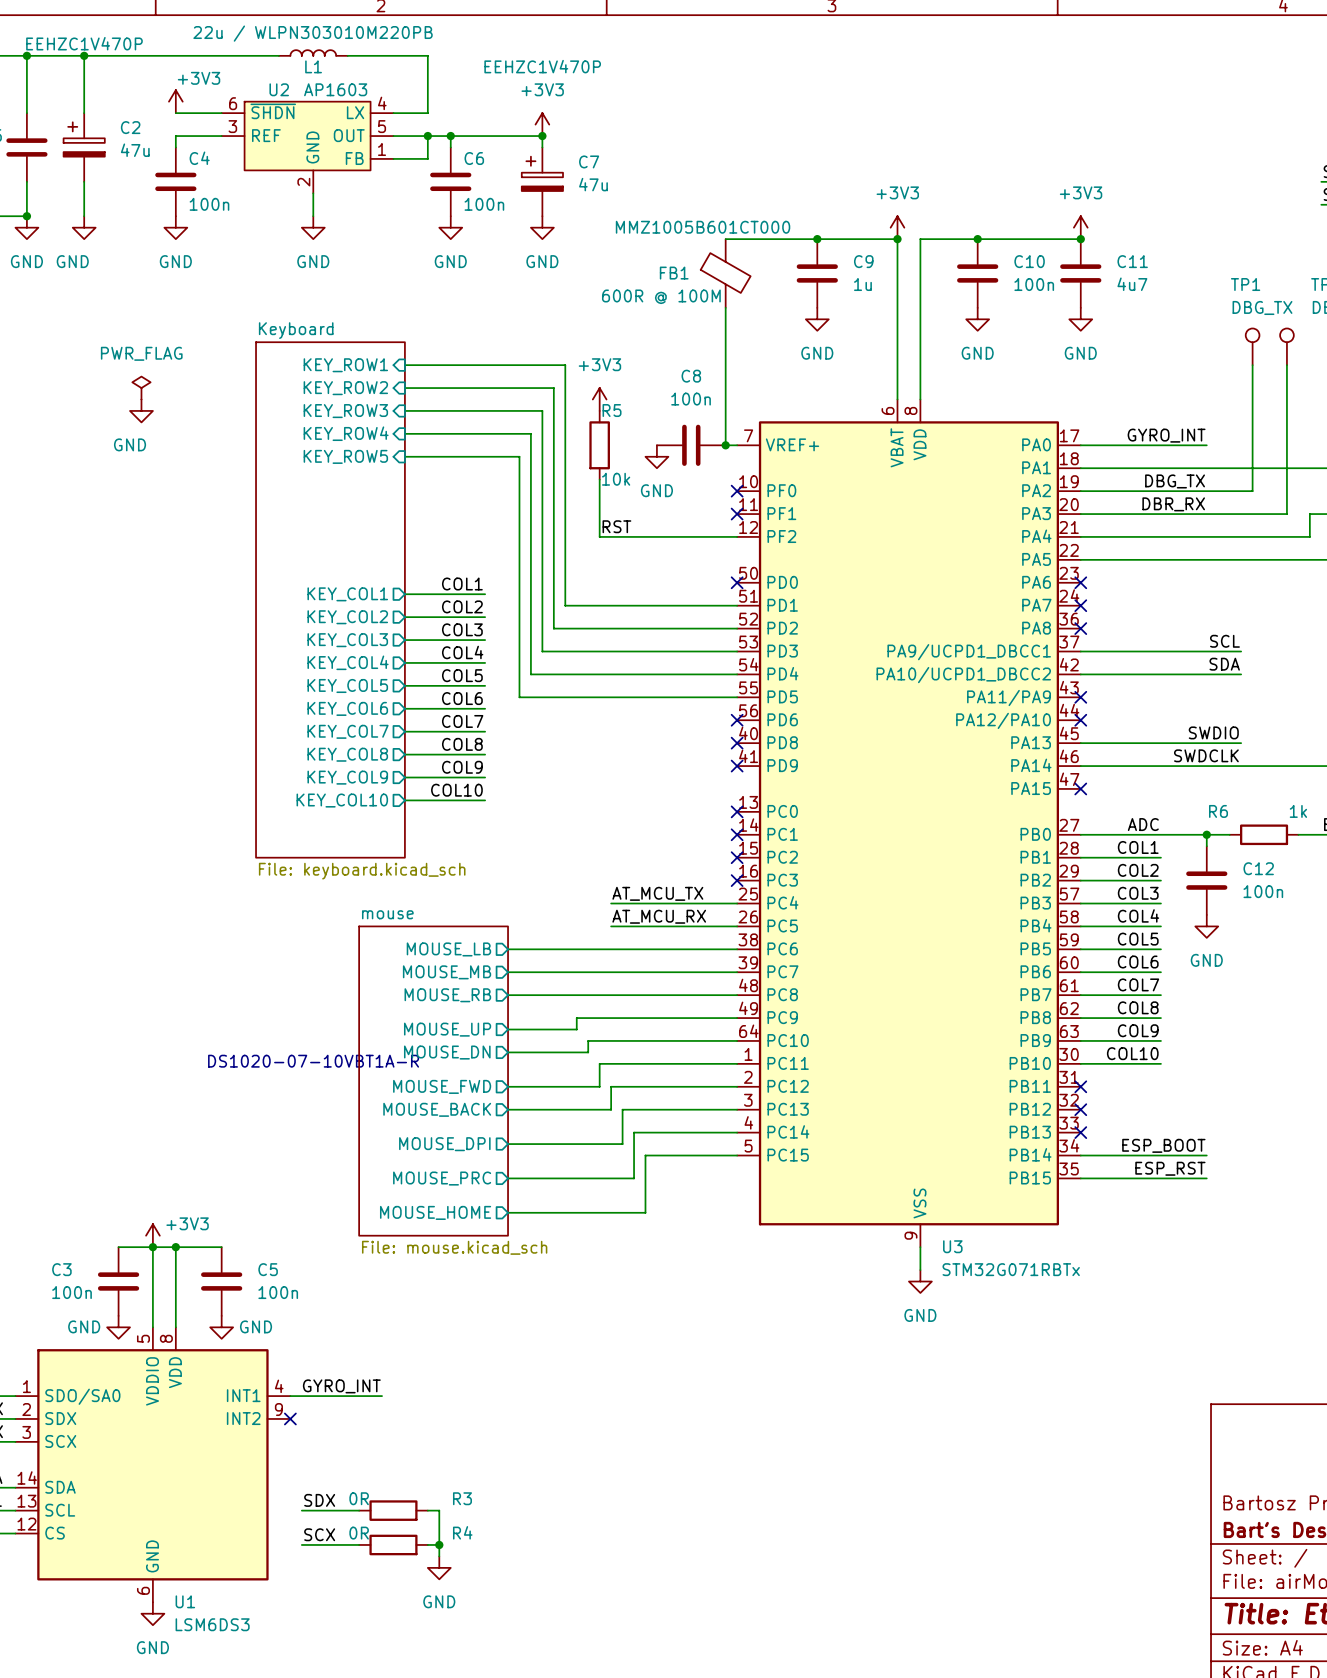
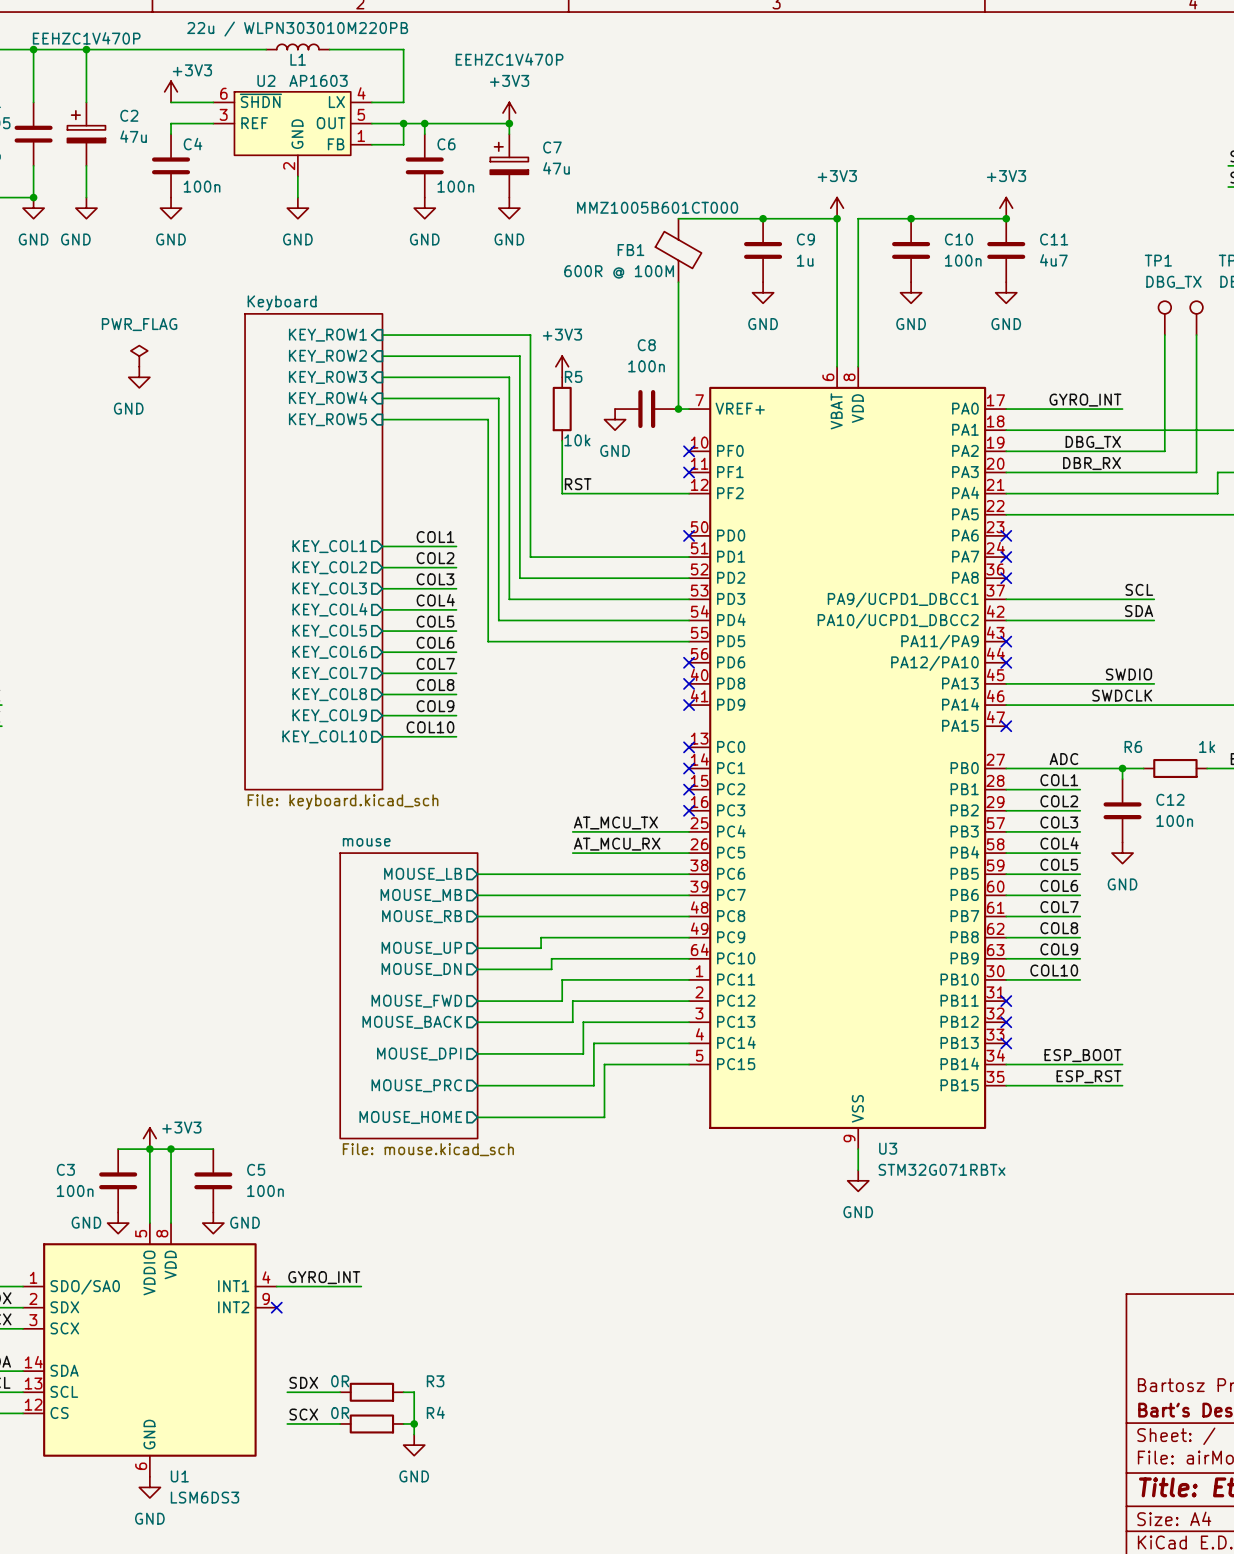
text: DS1020-07-10VBT1A-R (313, 1061) -> none

